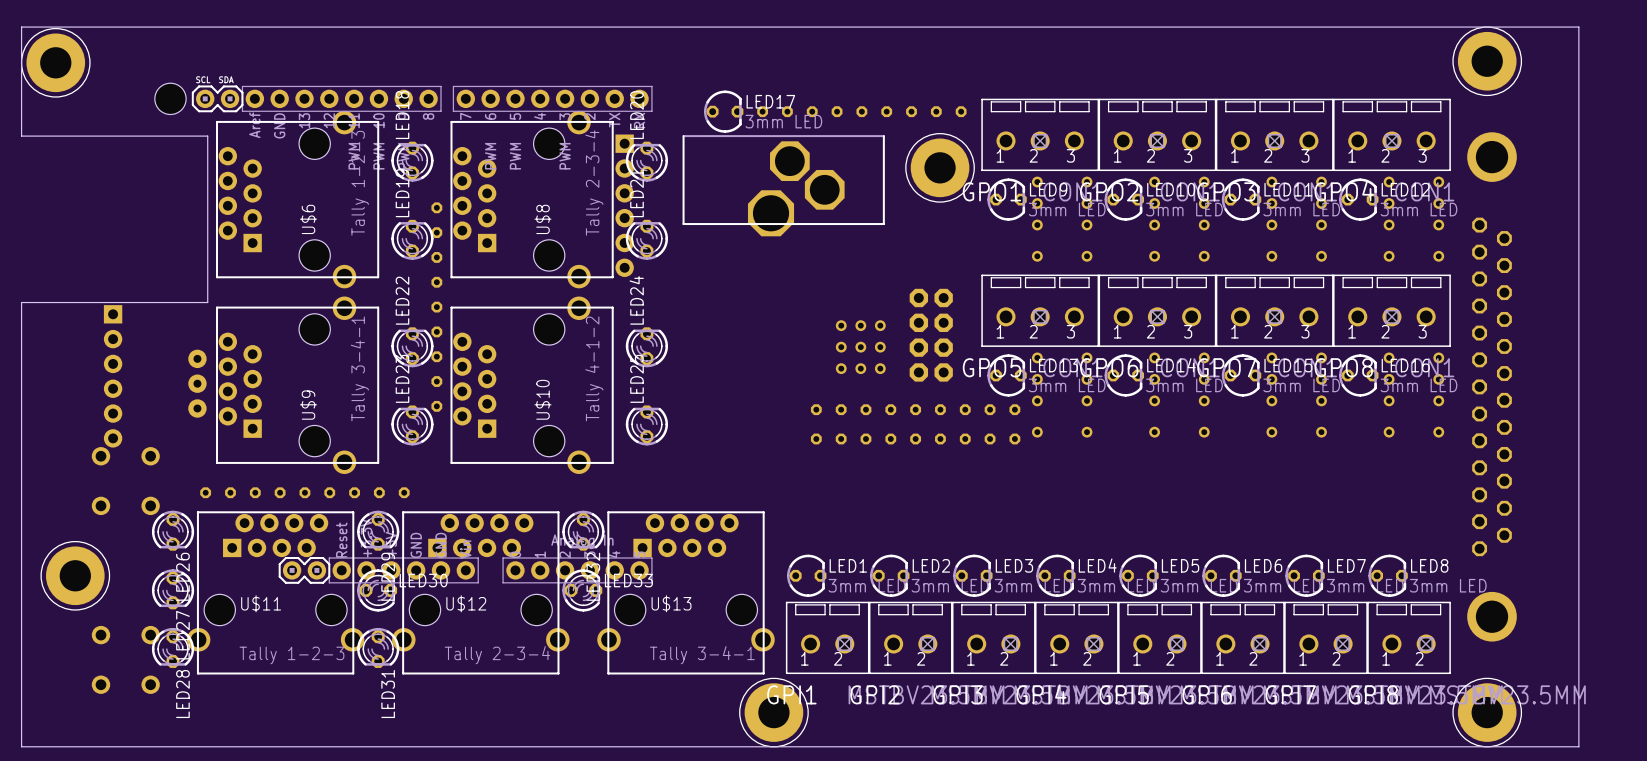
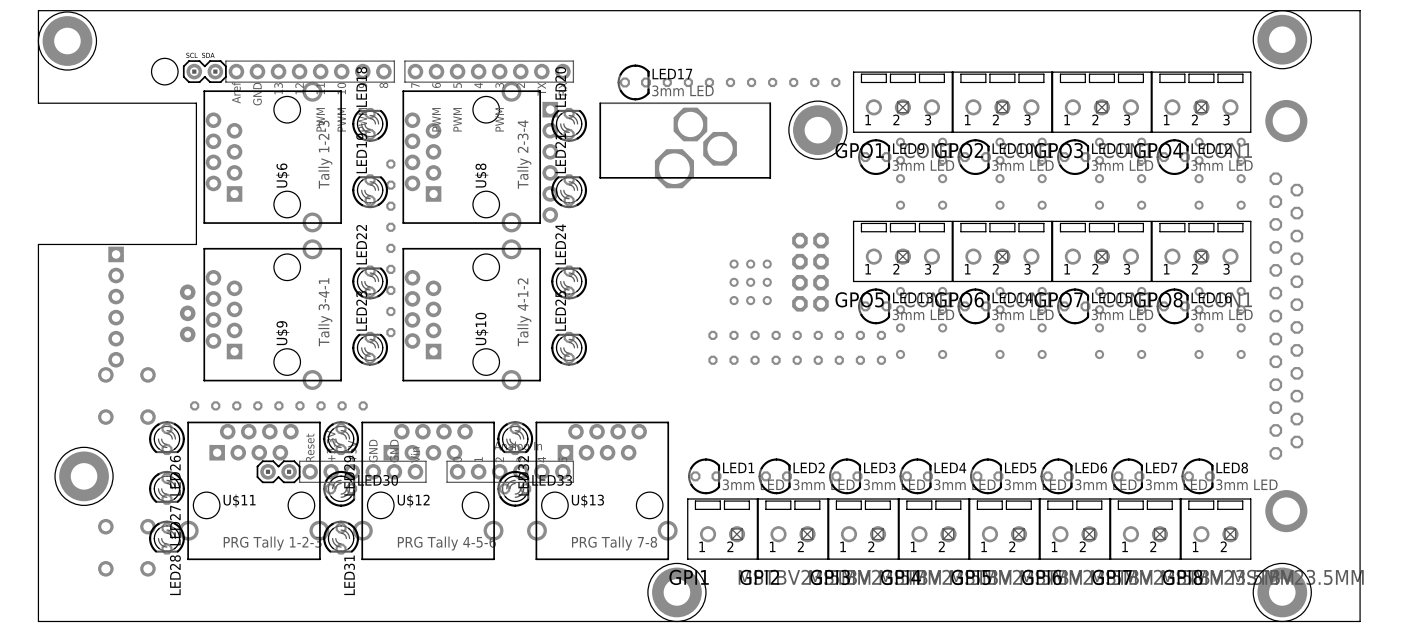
U$11 value: Tally 1-2-3 (291, 655) -> PRG Tally 1-2-3 (272, 543)
U$12 value: Tally 2-3-4 (497, 655) -> PRG Tally 4-5-6 (446, 543)
U$13 value: Tally 3-4-1 (702, 655) -> PRG Tally 7-8 (614, 543)

